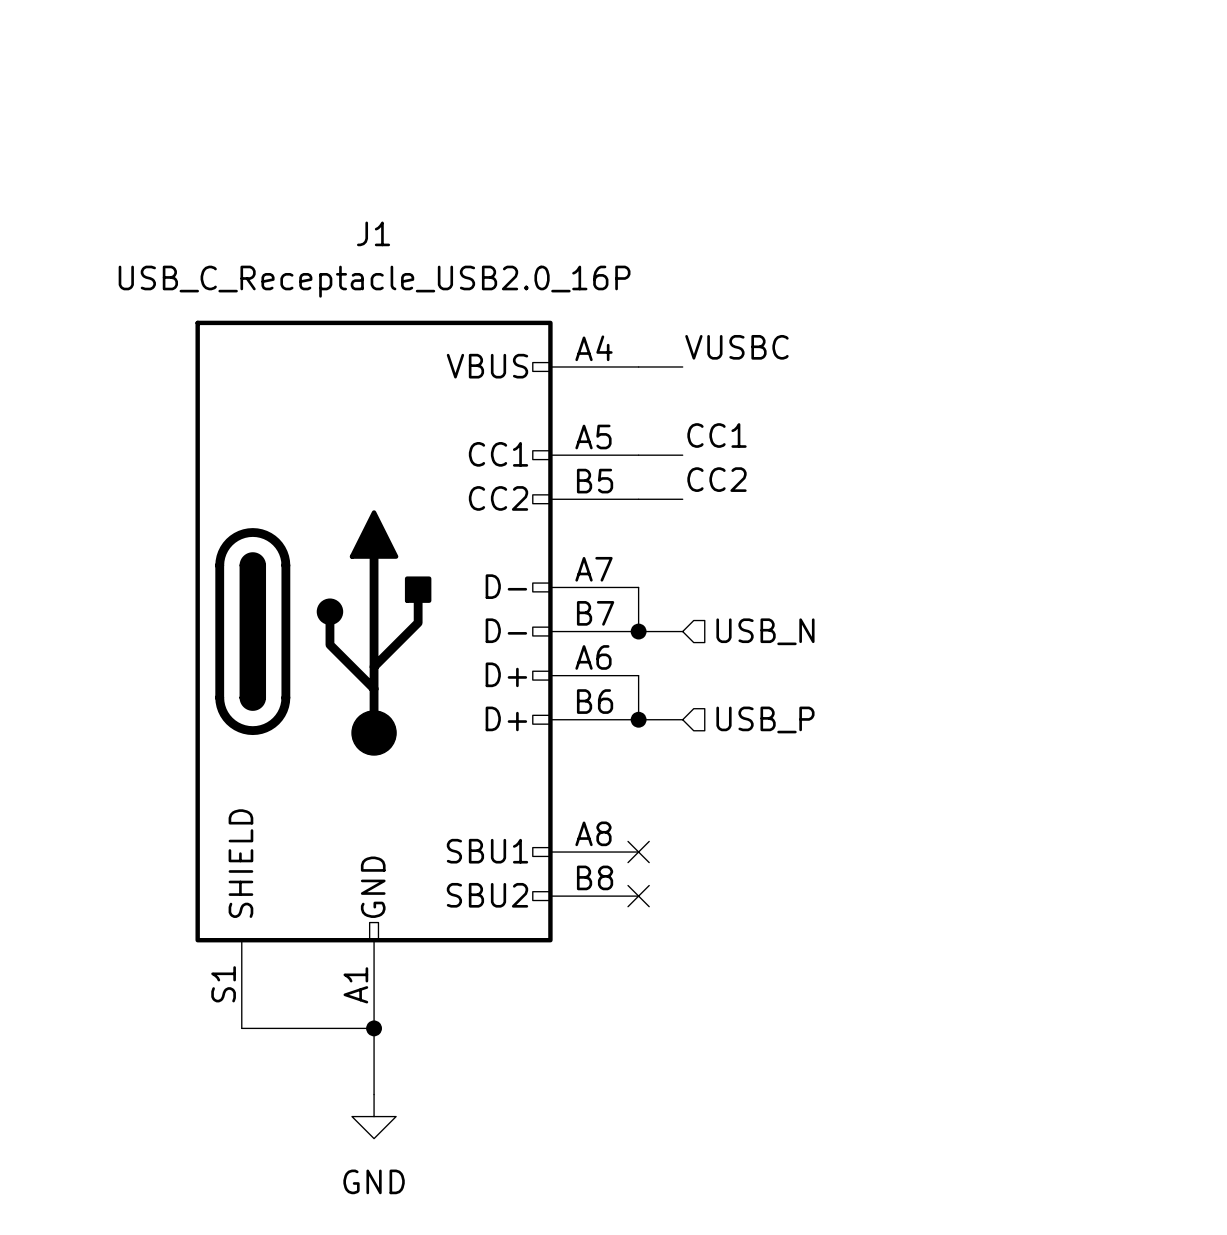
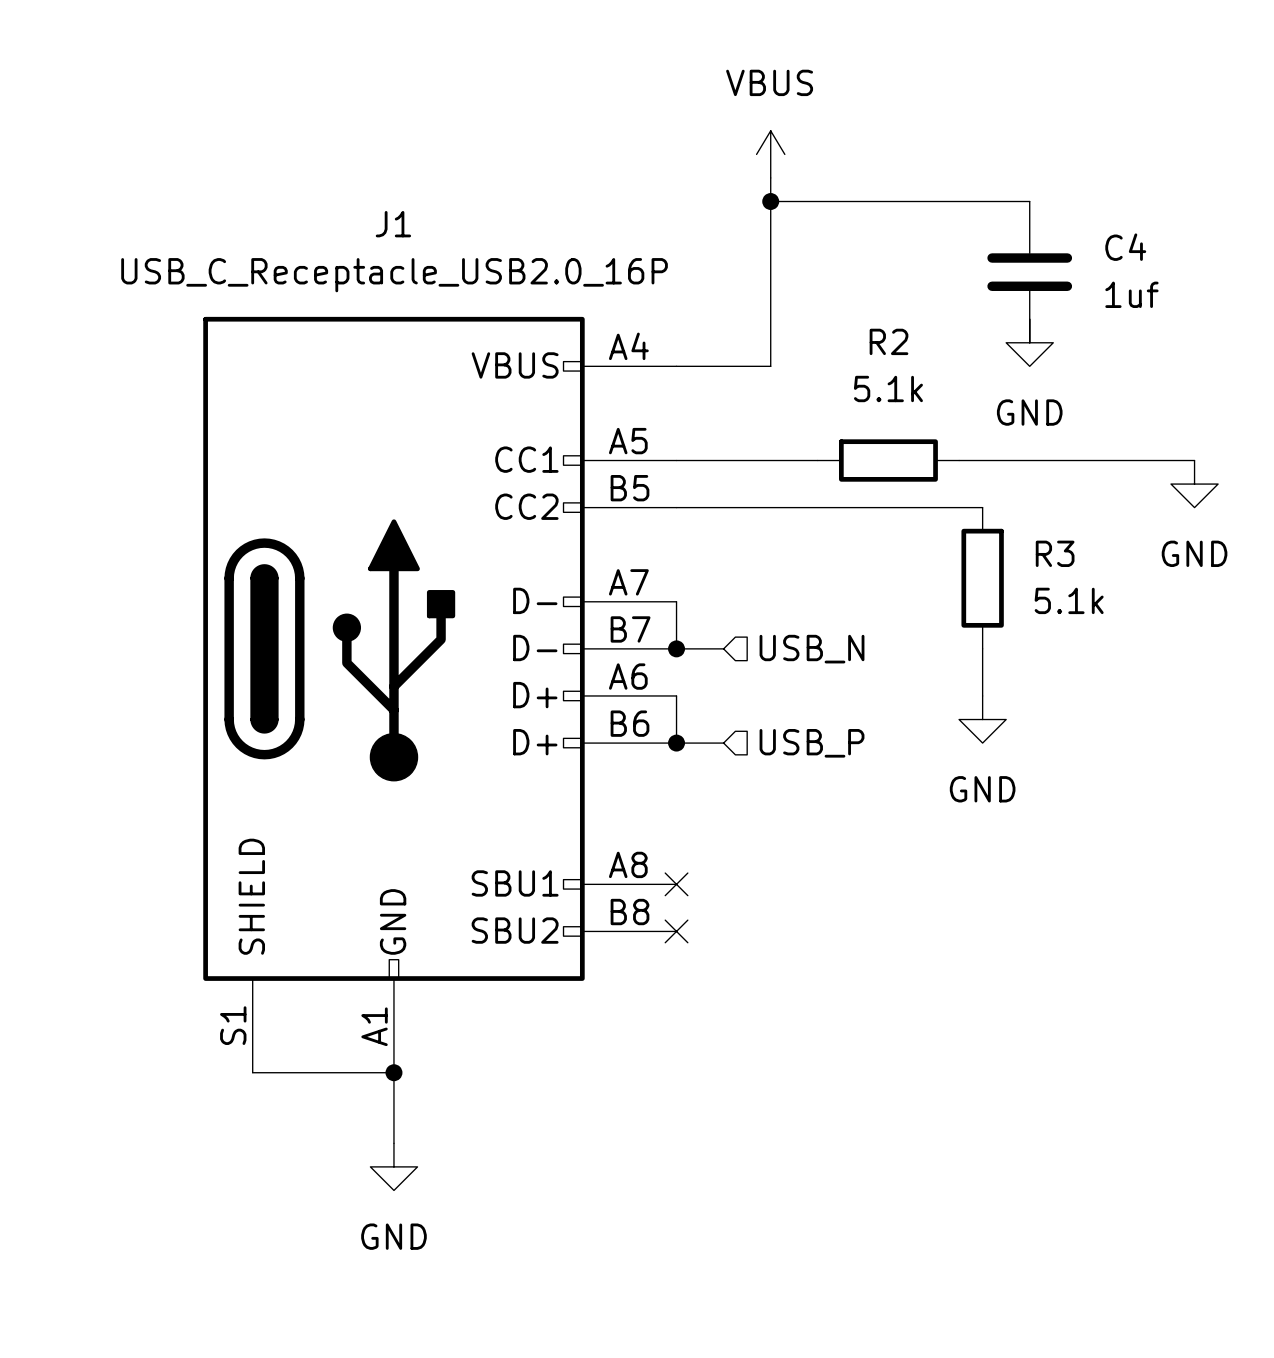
power symbol: none -> VBUS (770, 154)
wire: none -> (770, 177) (770, 366) (723, 366)
wire: none -> (770, 201) (1029, 201)
junction: none -> (770, 201)
C4: none -> 1uf (1029, 272)
power symbol: none -> GND (1029, 342)
label: VUSBC (736, 347) -> none
label: CC1 (716, 435) -> none
wire: none -> (723, 460) (817, 460)
R2: none -> 5.1k (888, 460)
wire: none -> (959, 460) (1194, 460)
power symbol: none -> GND (1194, 484)
label: CC2 (716, 479) -> none
wire: none -> (723, 507) (982, 507)
R3: none -> 5.1k (982, 578)
wire: none -> (982, 648) (982, 695)
power symbol: none -> GND (982, 719)

